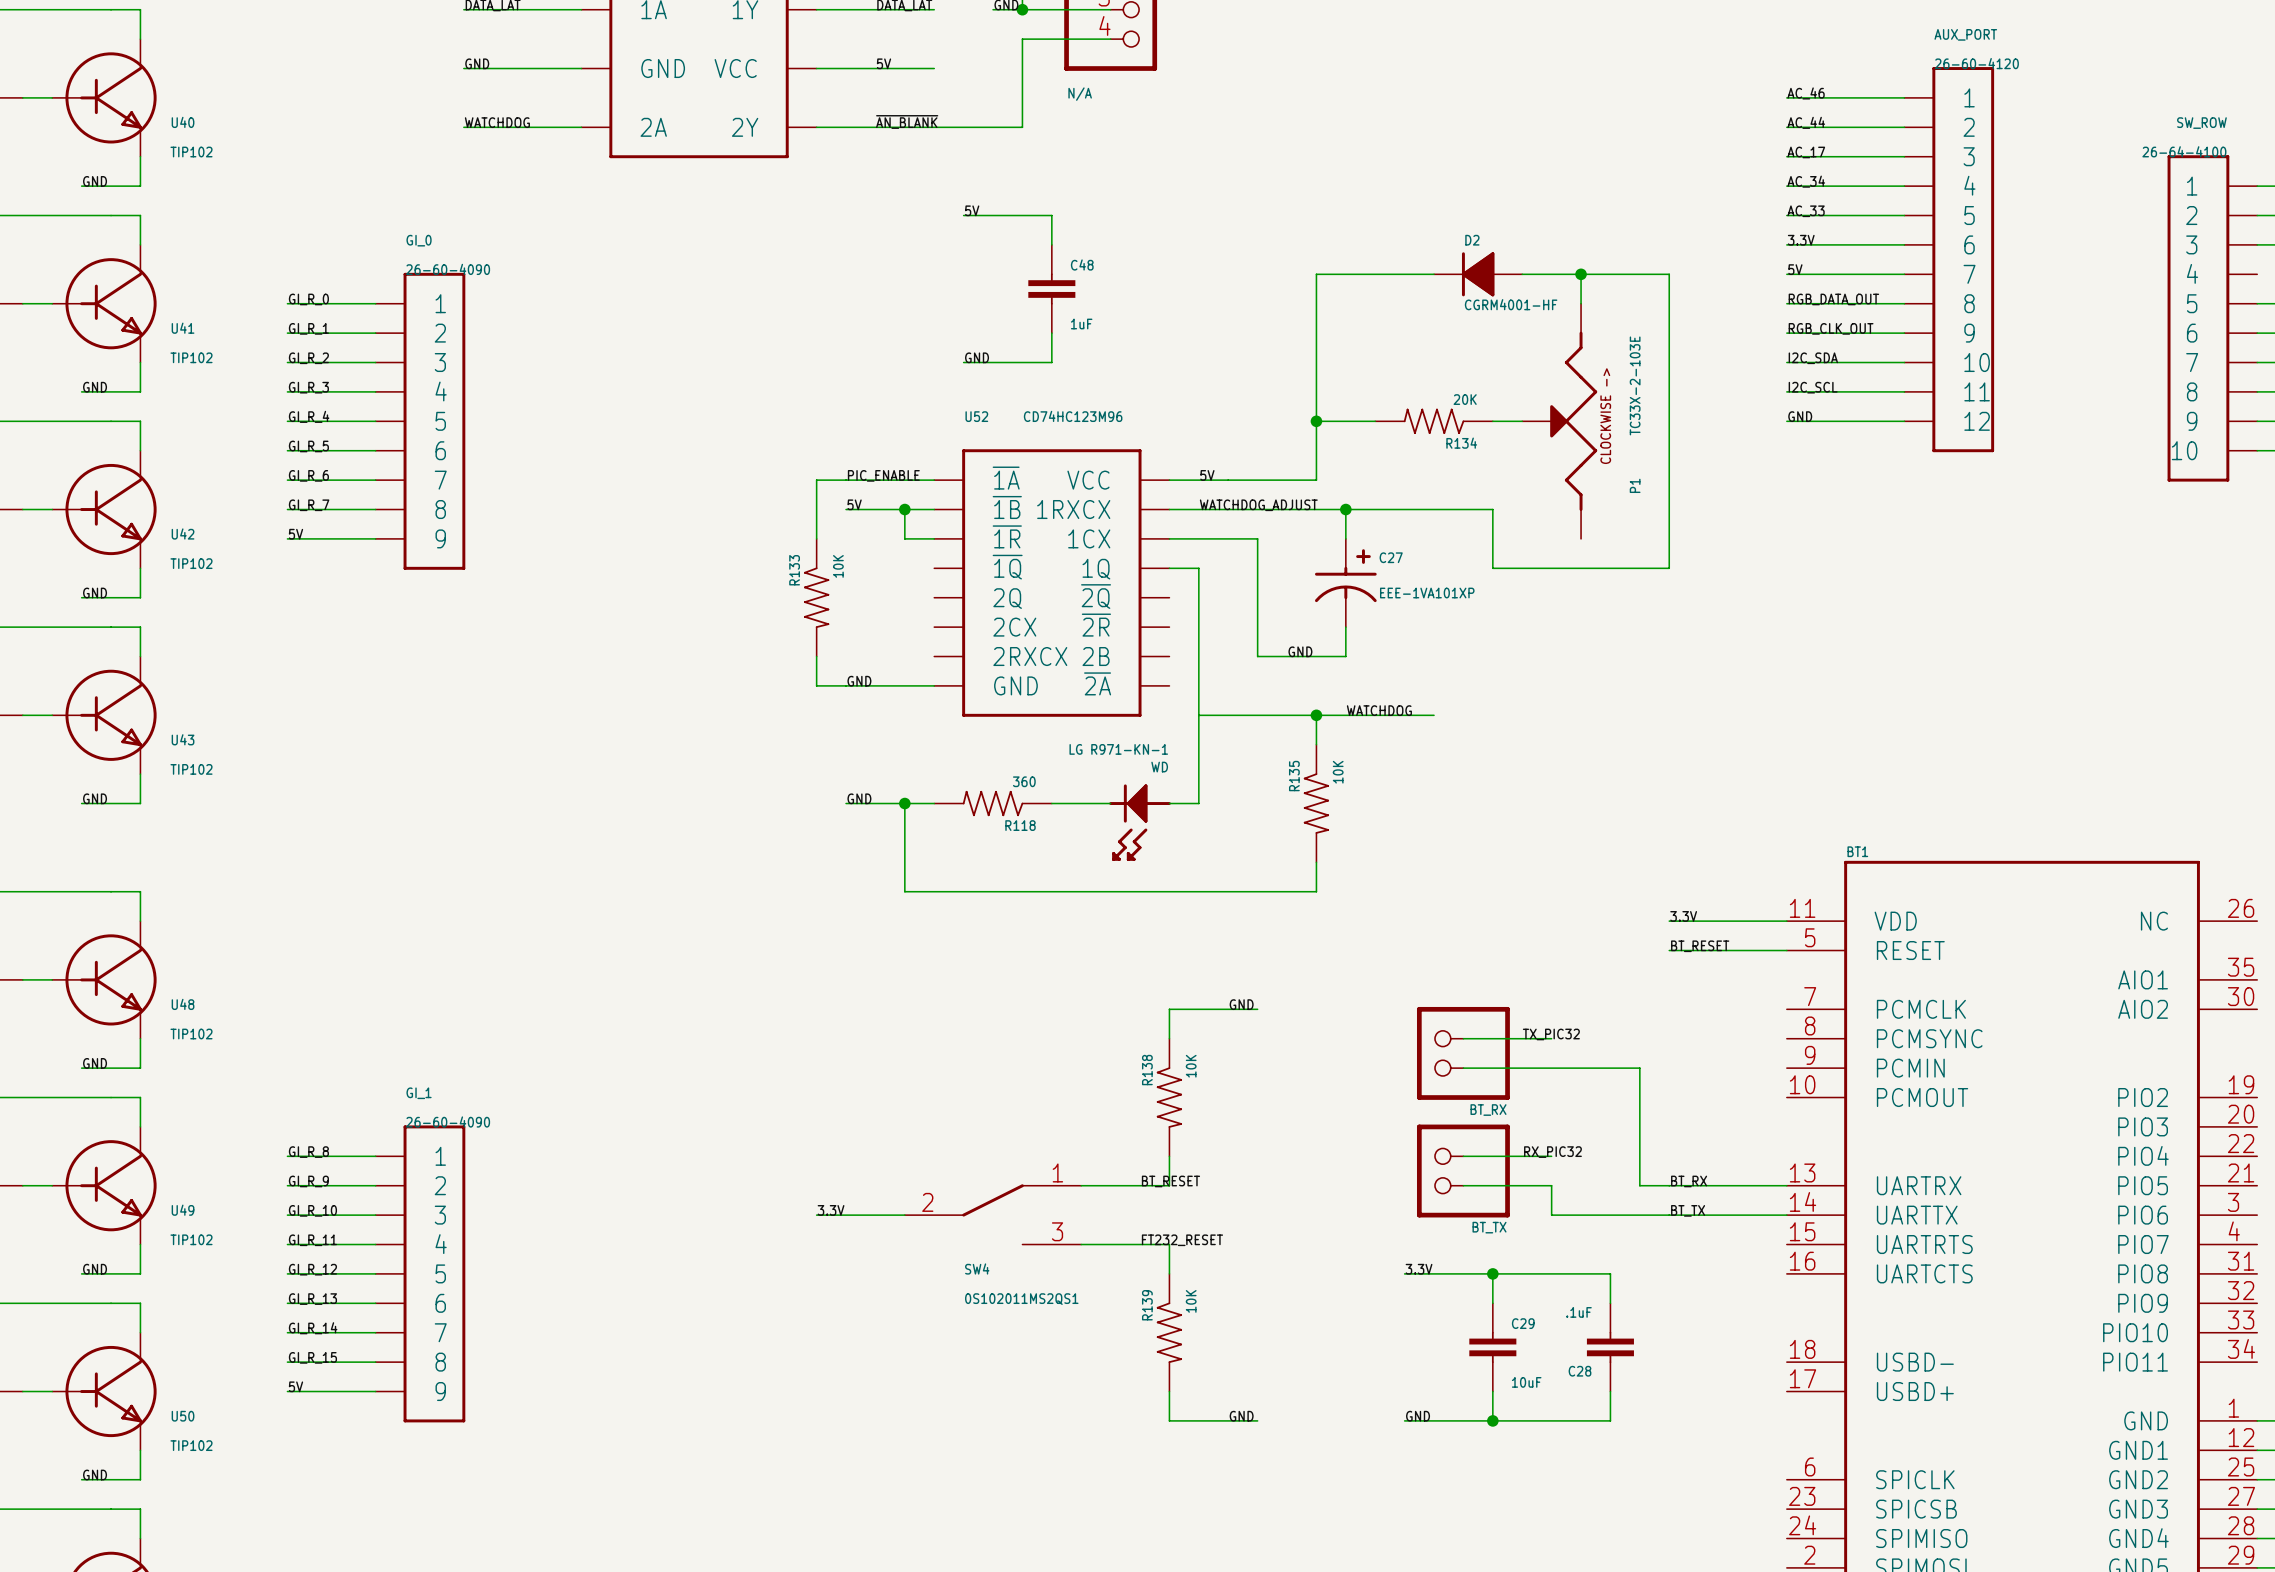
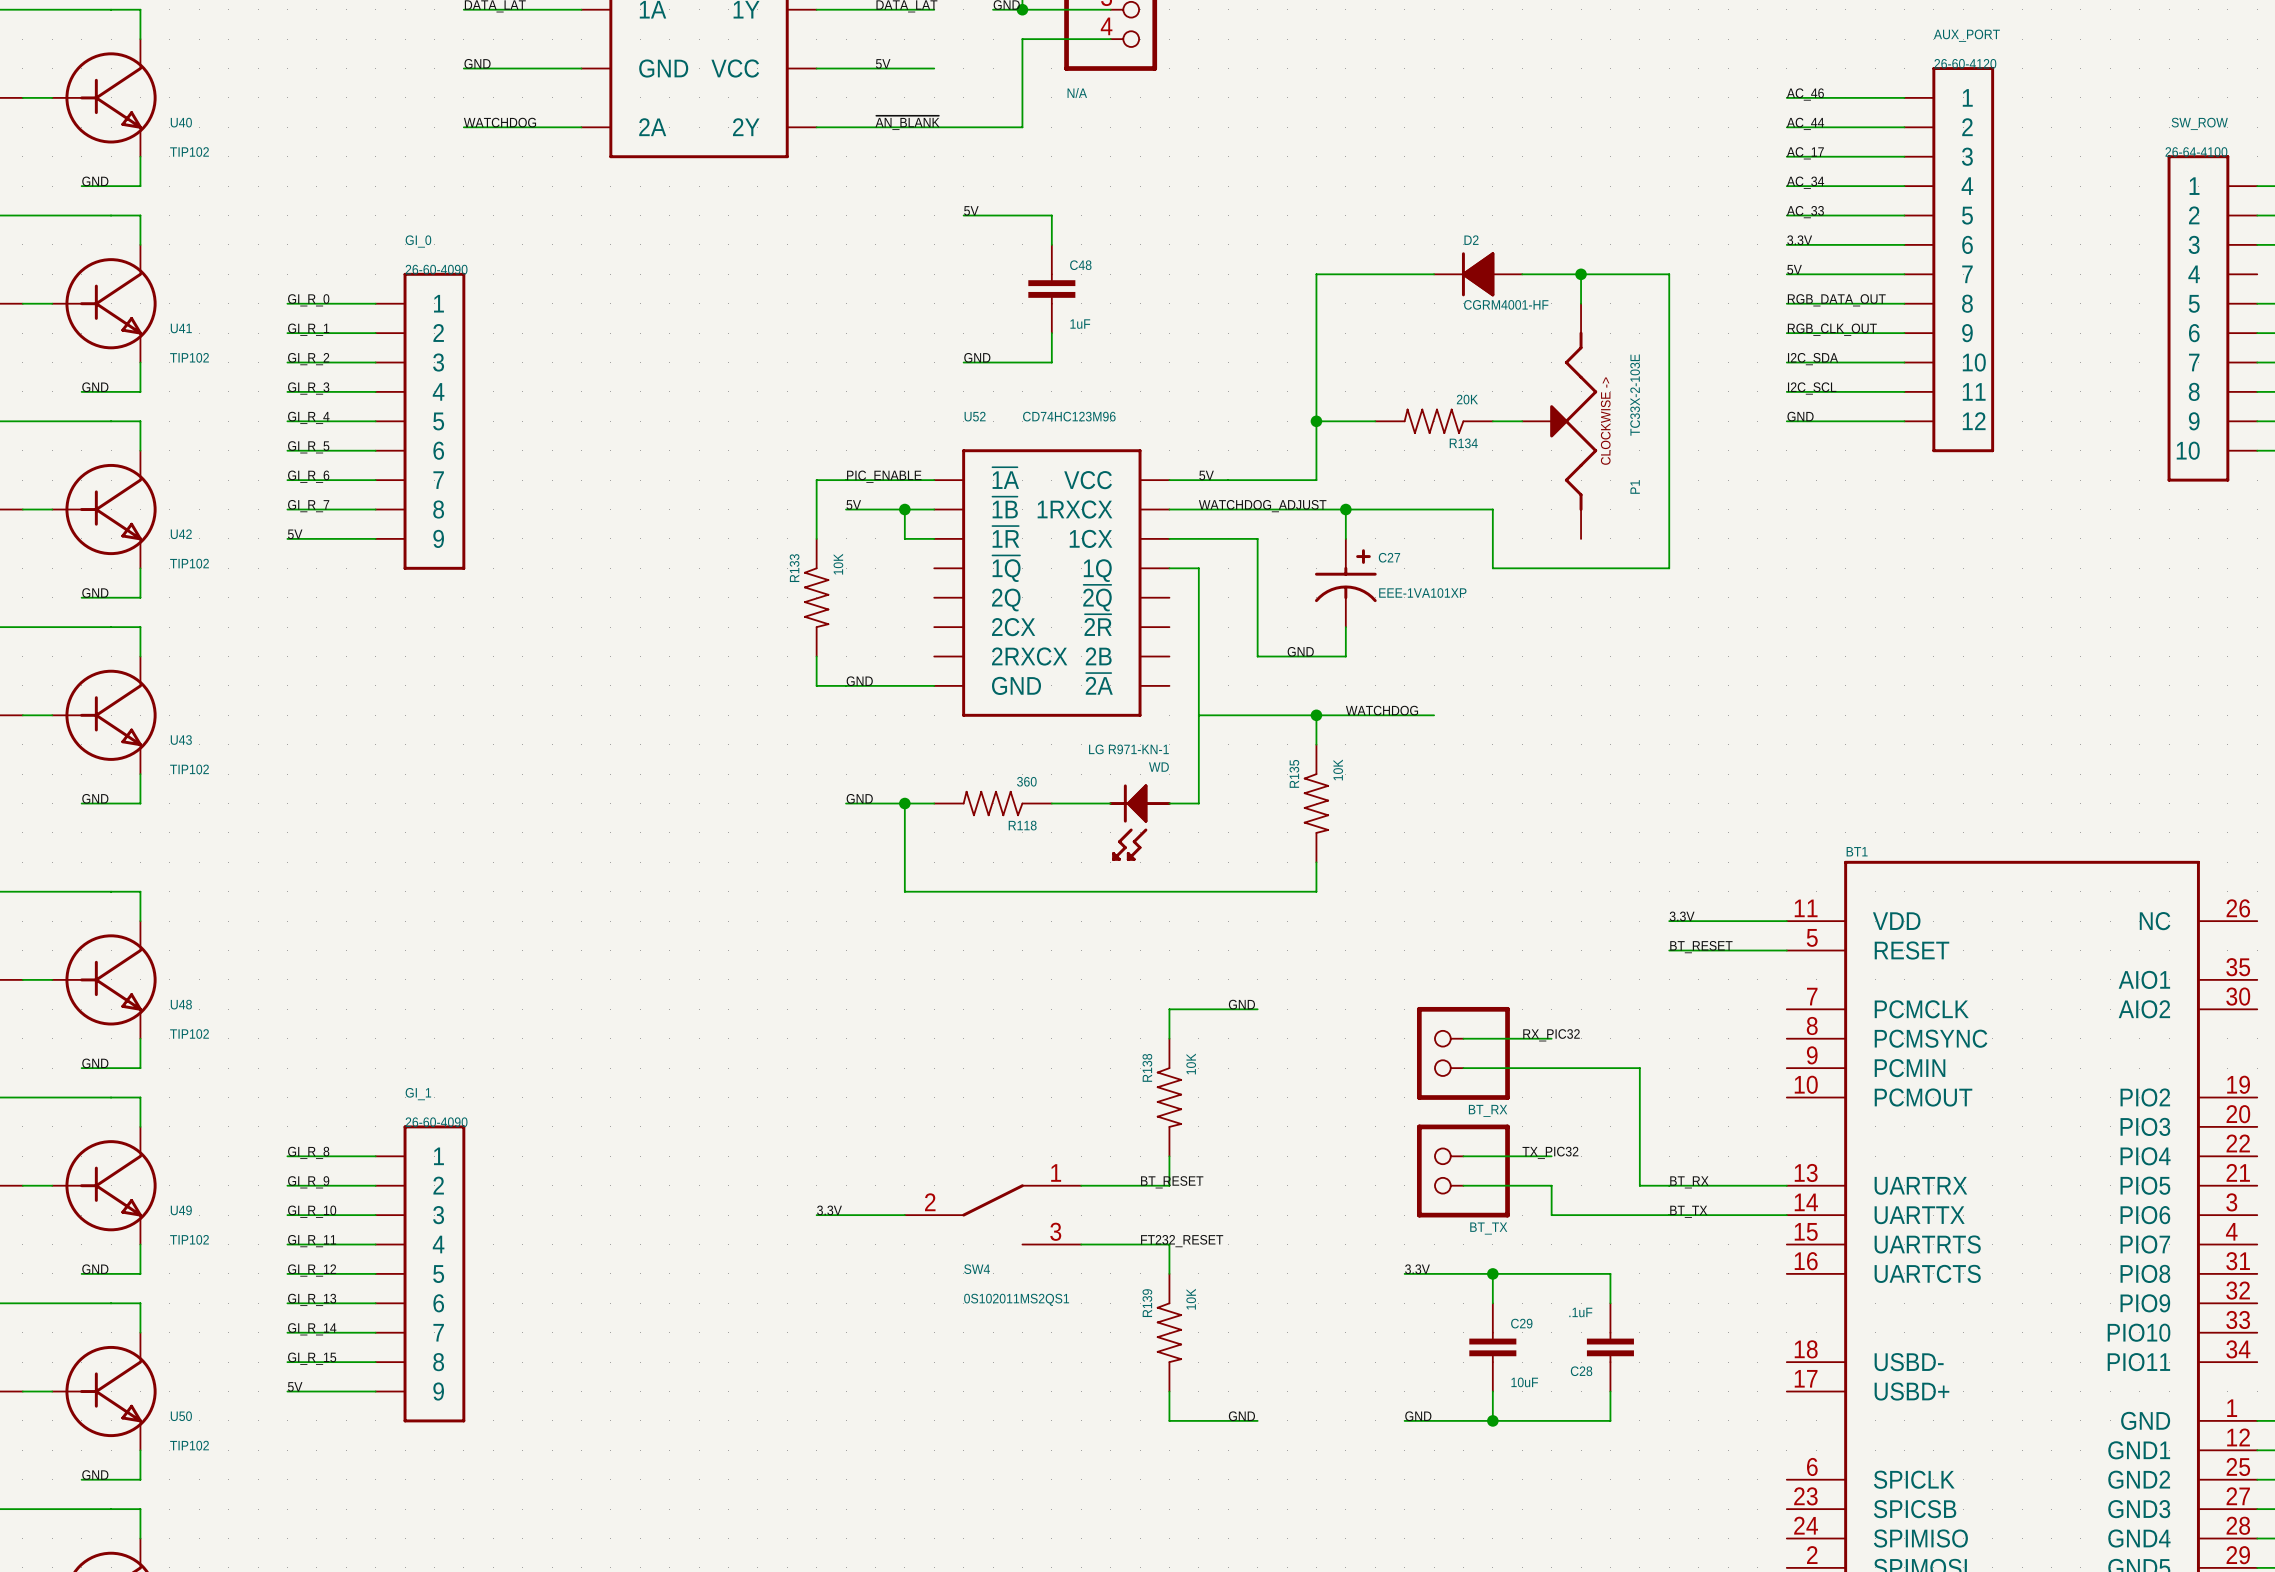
label: TX_PIC32 (1551, 1034) -> RX_PIC32 (1551, 1035)
label: RX_PIC32 (1552, 1152) -> TX_PIC32 (1550, 1152)

